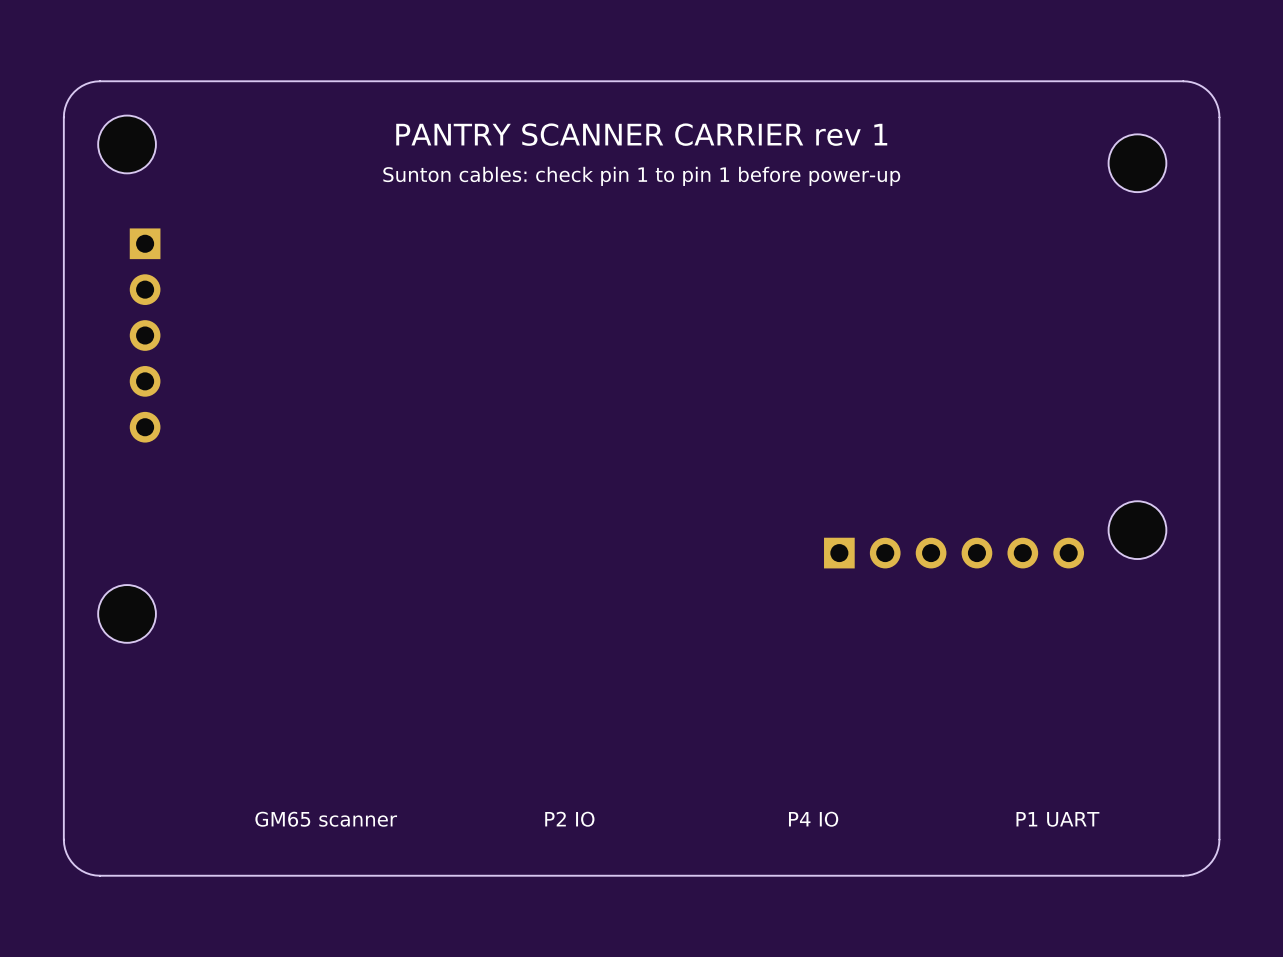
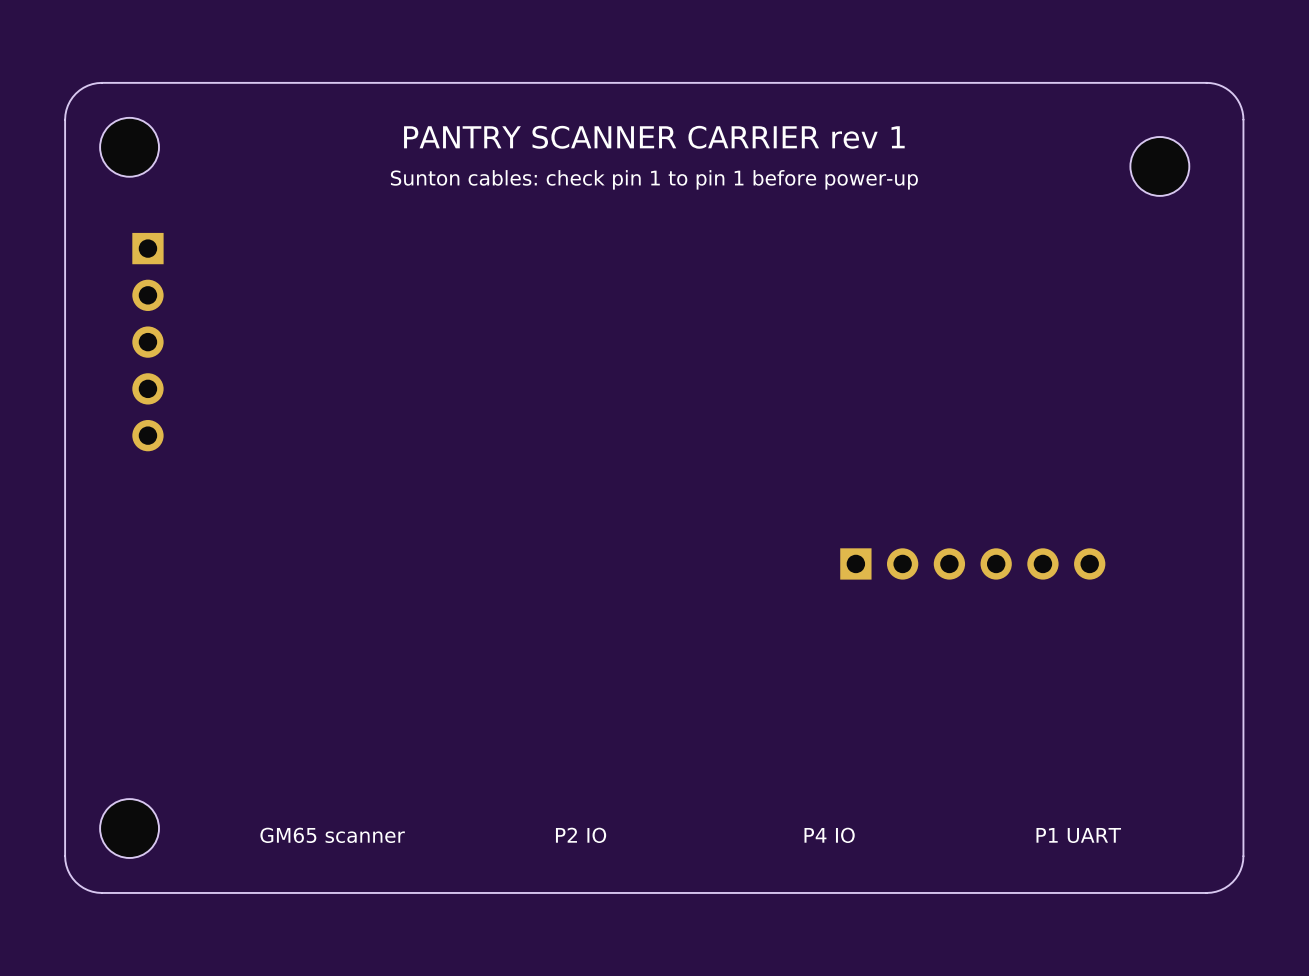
part: (1137, 530) -> none
part position: (127, 613) -> (129, 828)

